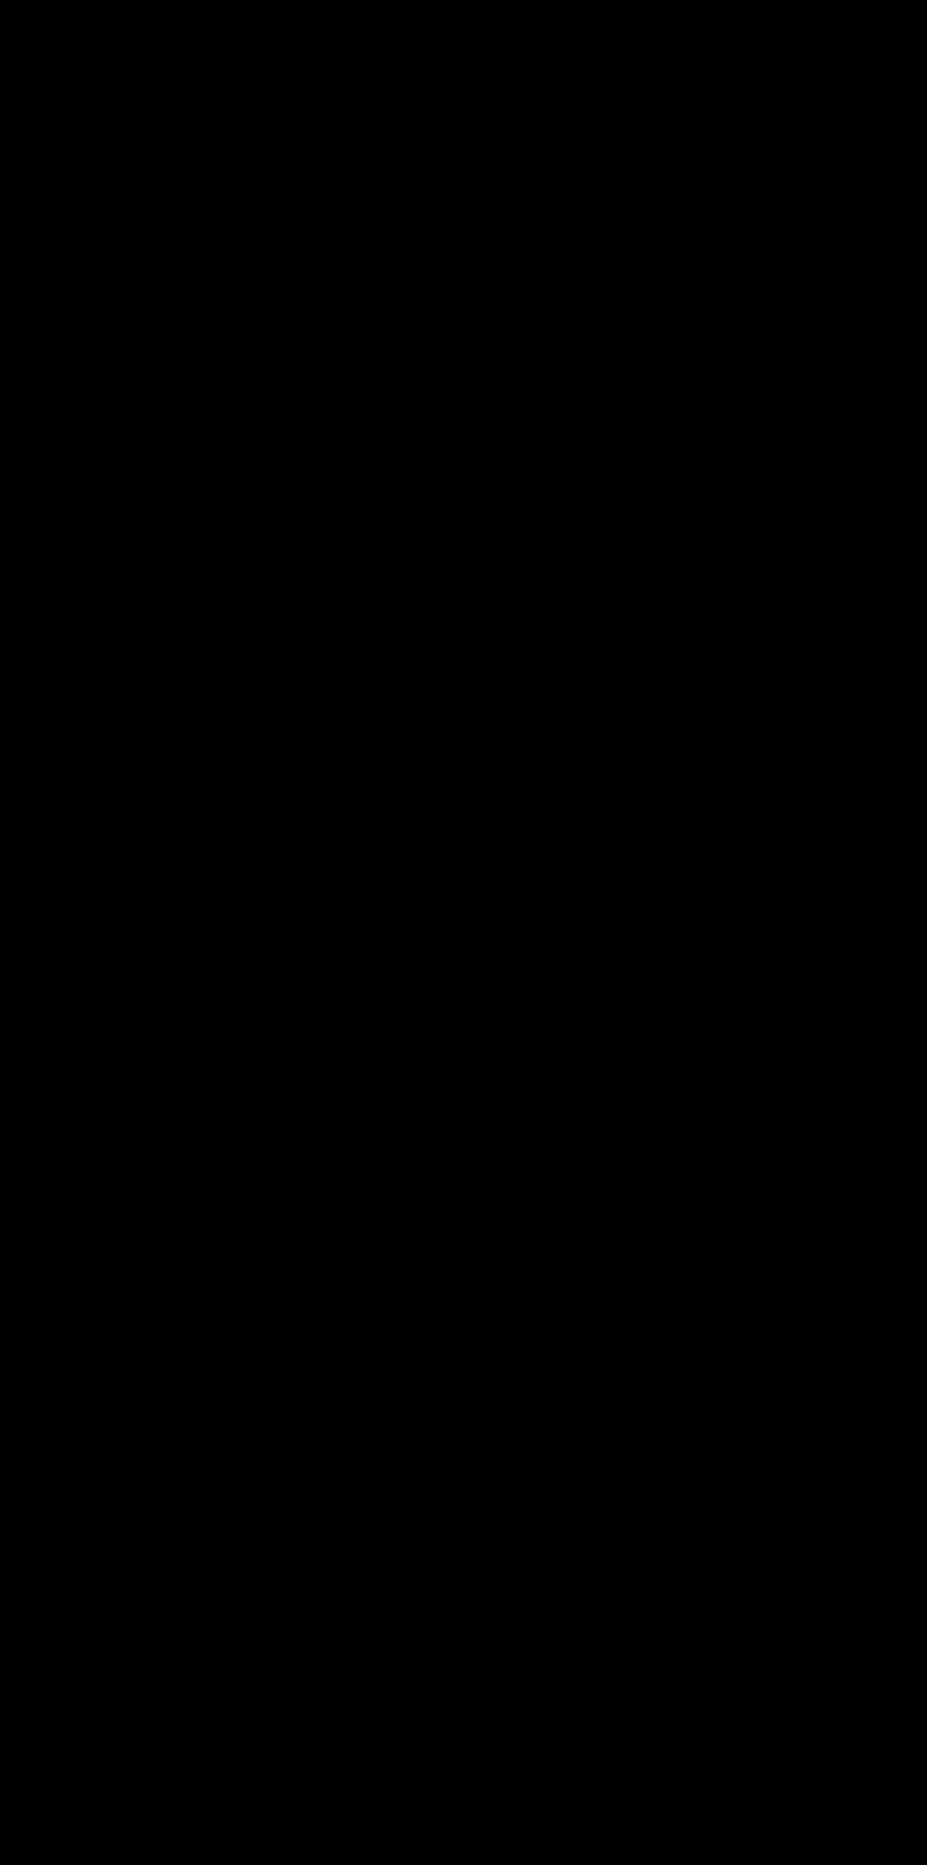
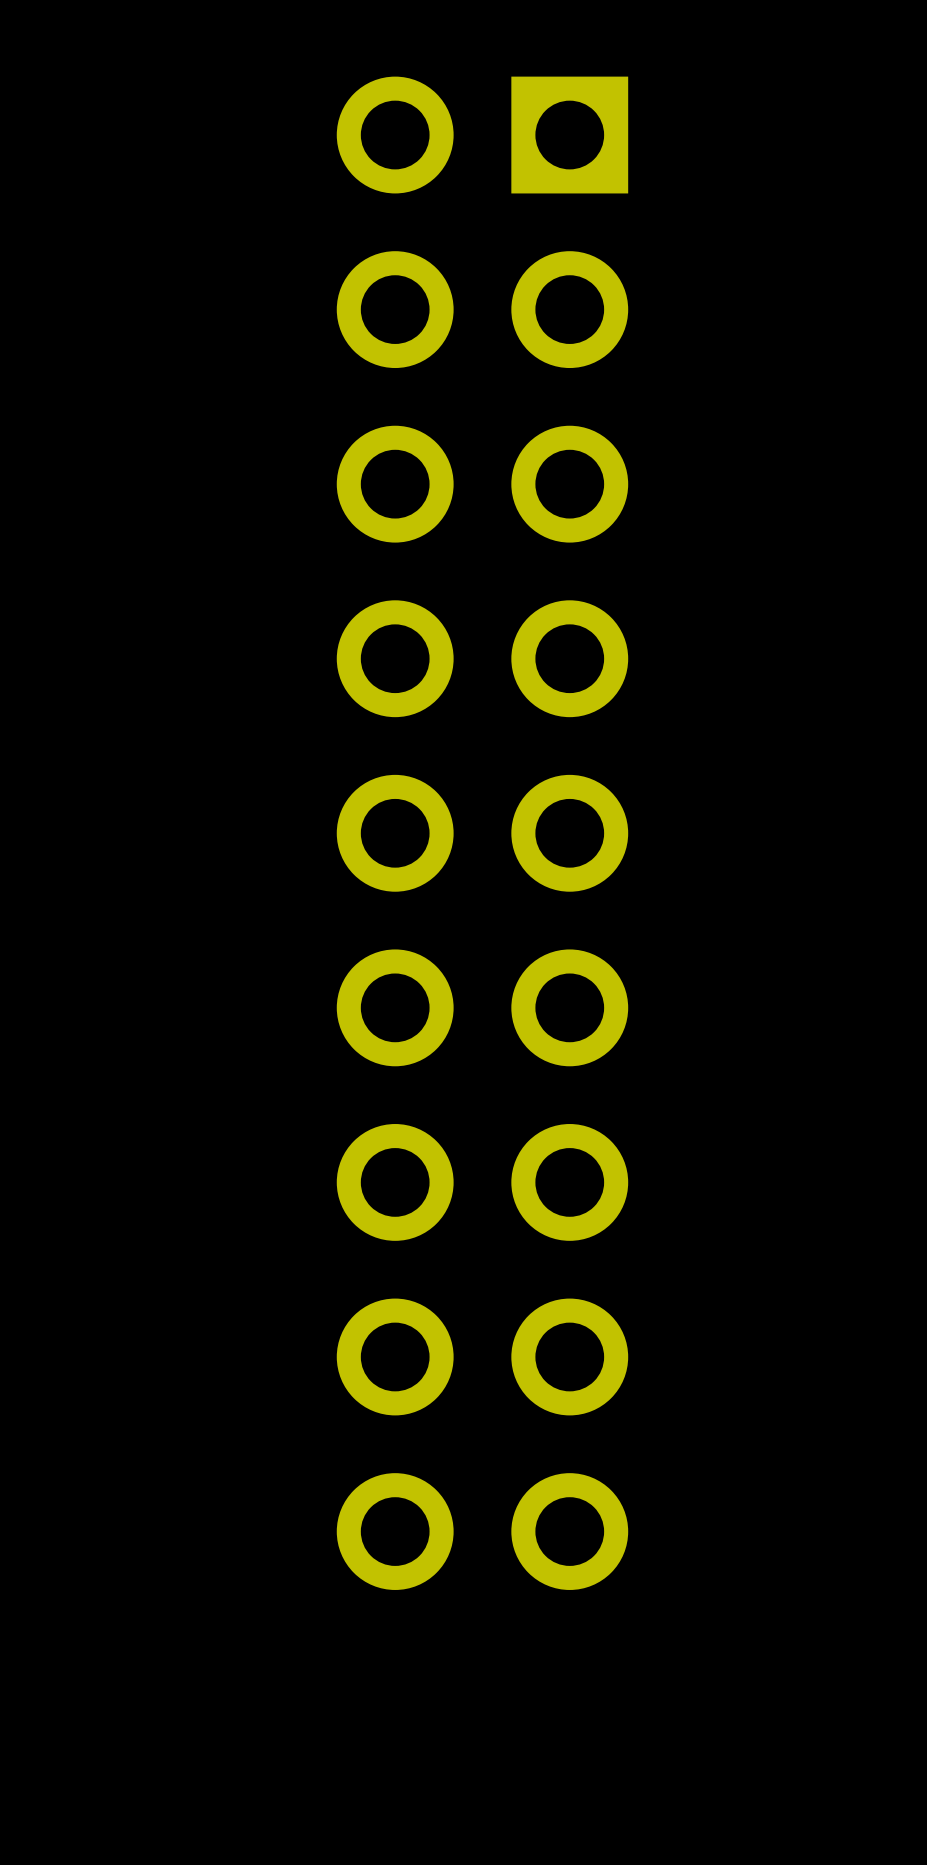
part: none -> (482, 833)

